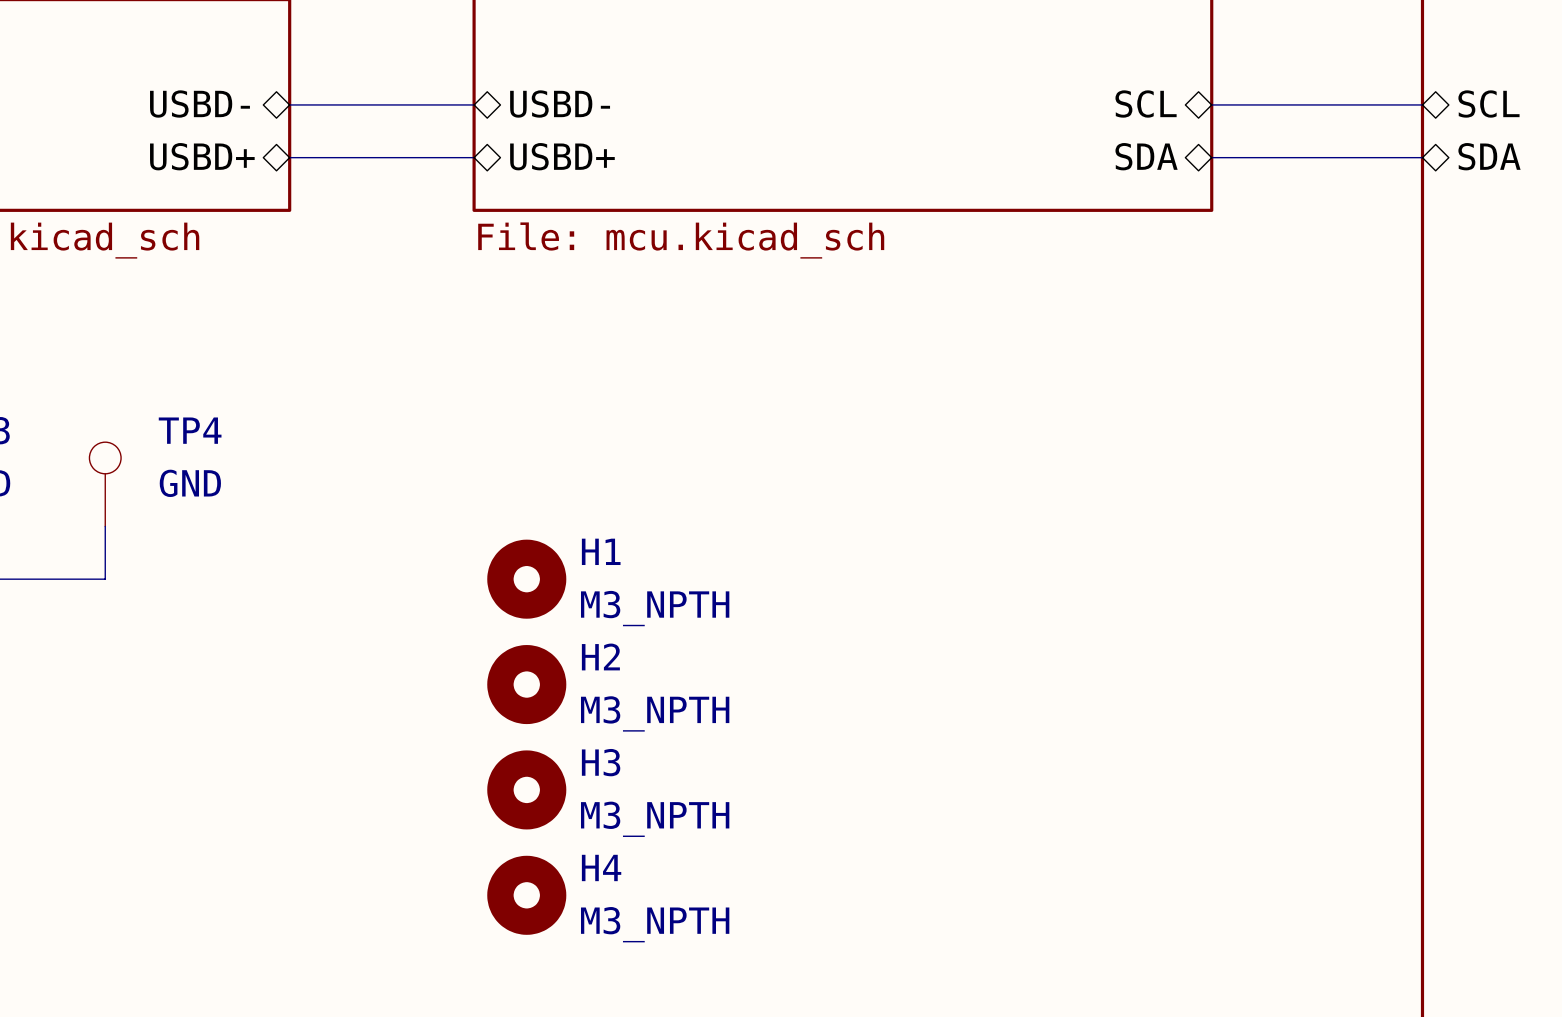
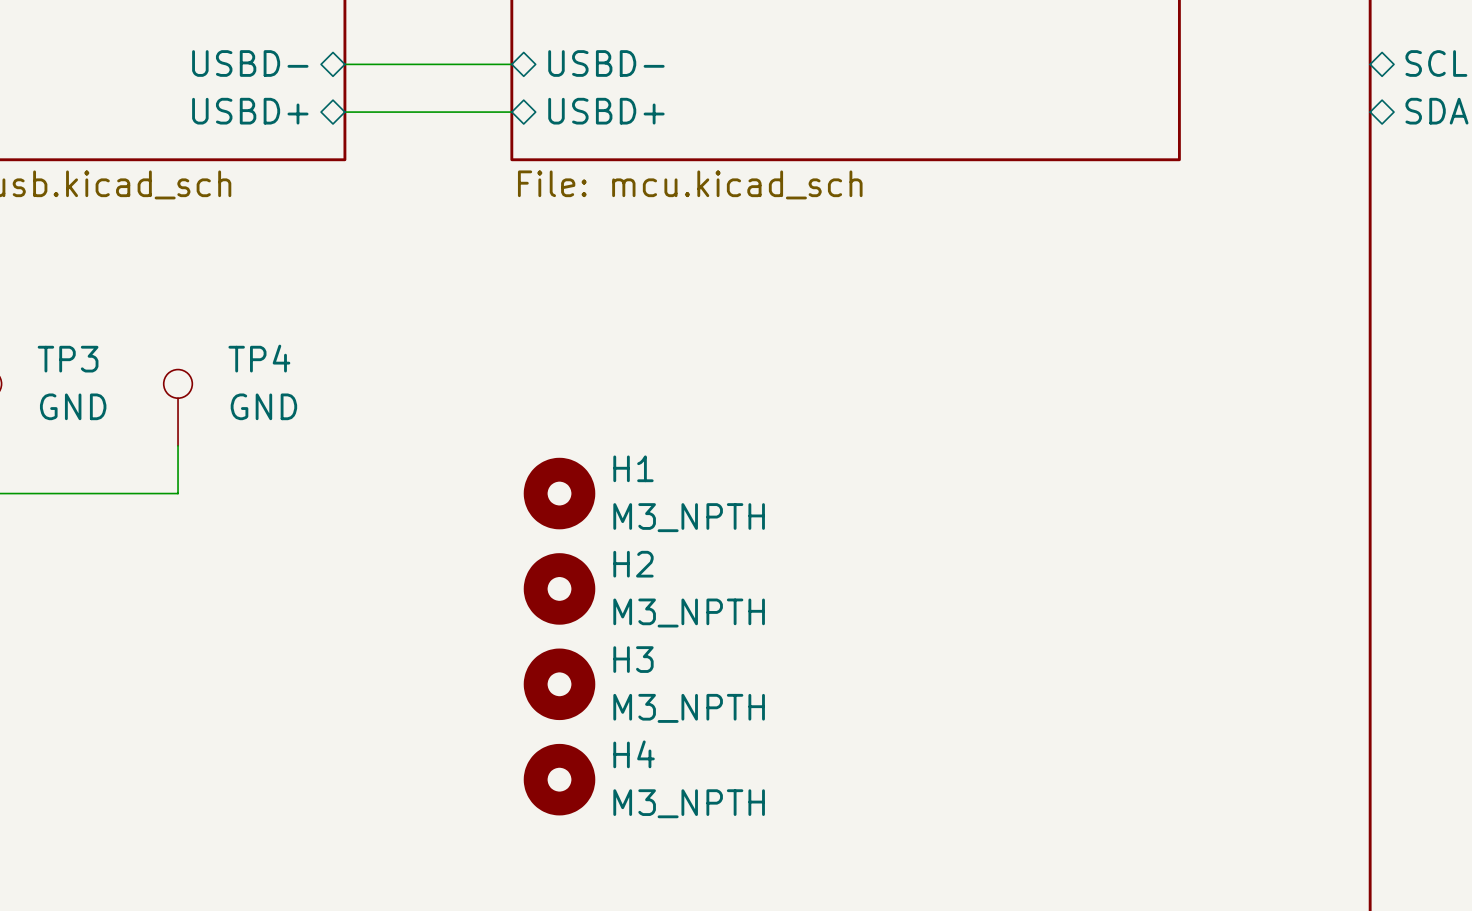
sheet pin: SCL (1146, 104) -> none
wire: (1211, 104) (1422, 104) -> none
sheet pin: SDA (1146, 156) -> none
wire: (1211, 157) (1422, 157) -> none

